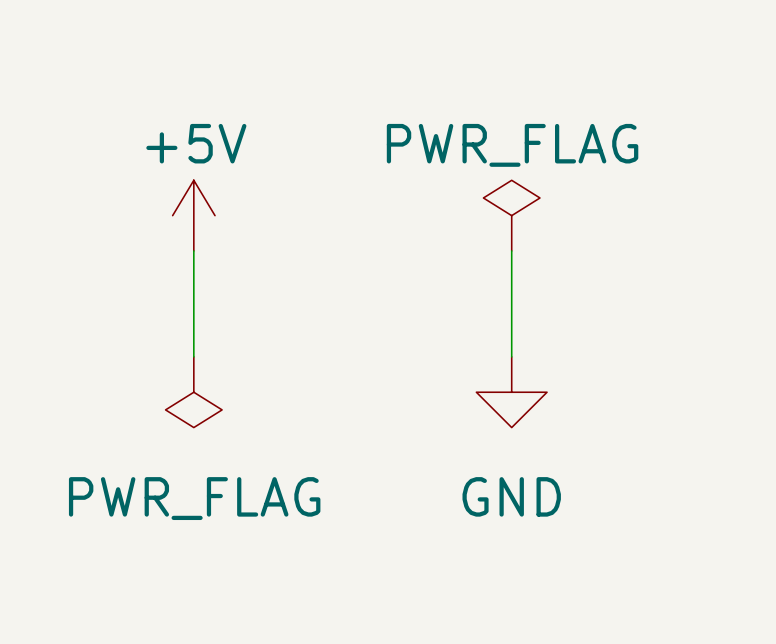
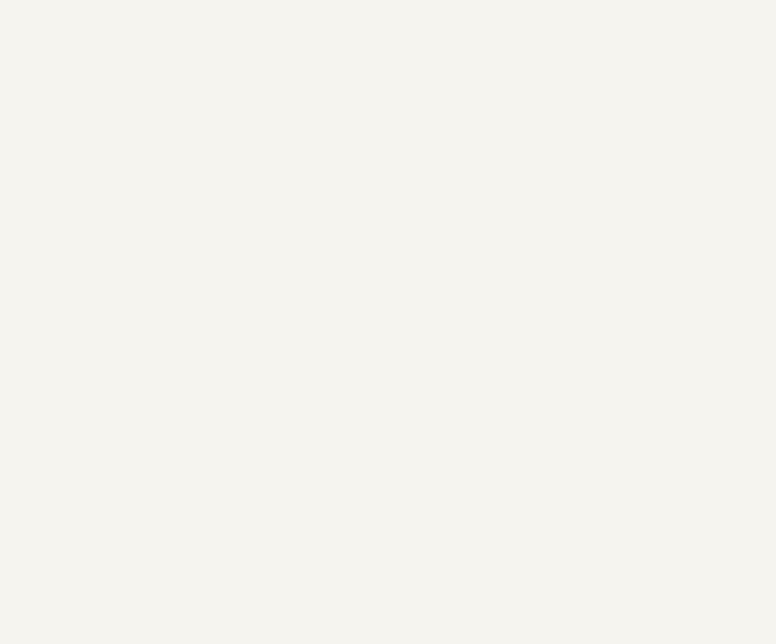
power symbol: +5V (193, 215) -> none
power symbol: PWR_FLAG (511, 215) -> none
wire: (193, 250) (193, 356) -> none
wire: (511, 250) (511, 356) -> none
power symbol: PWR_FLAG (193, 392) -> none
power symbol: GND (511, 392) -> none

